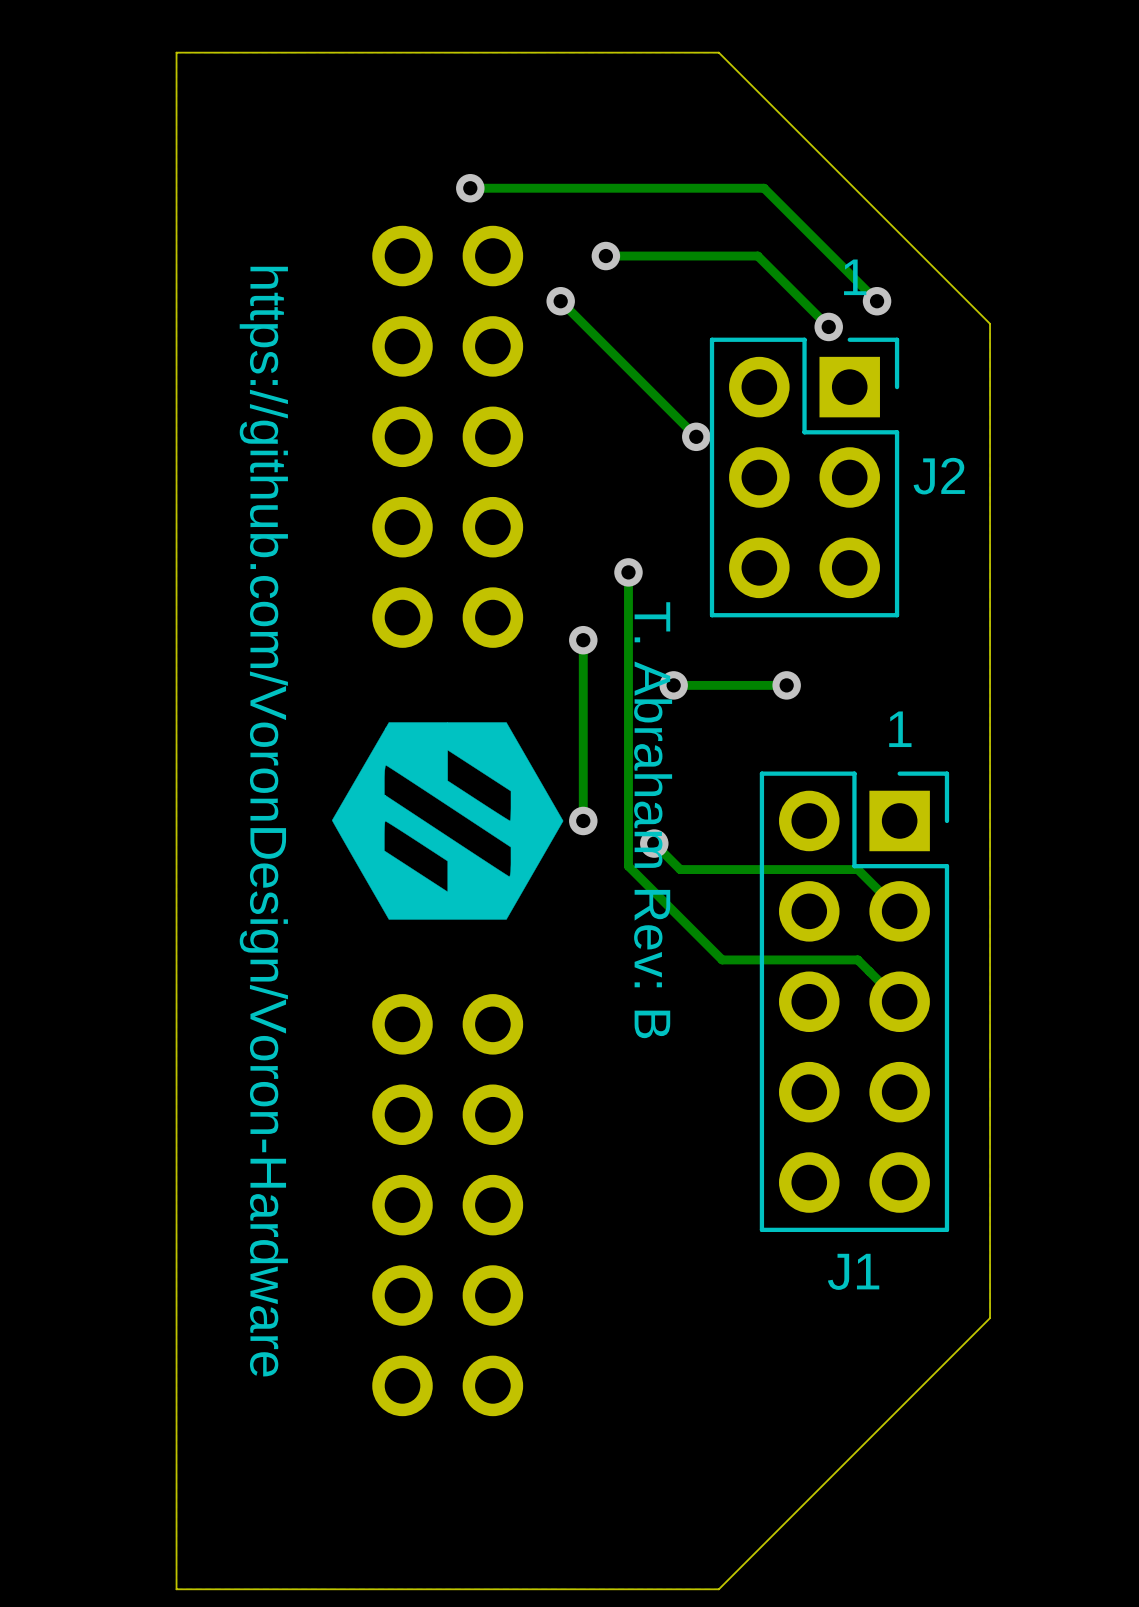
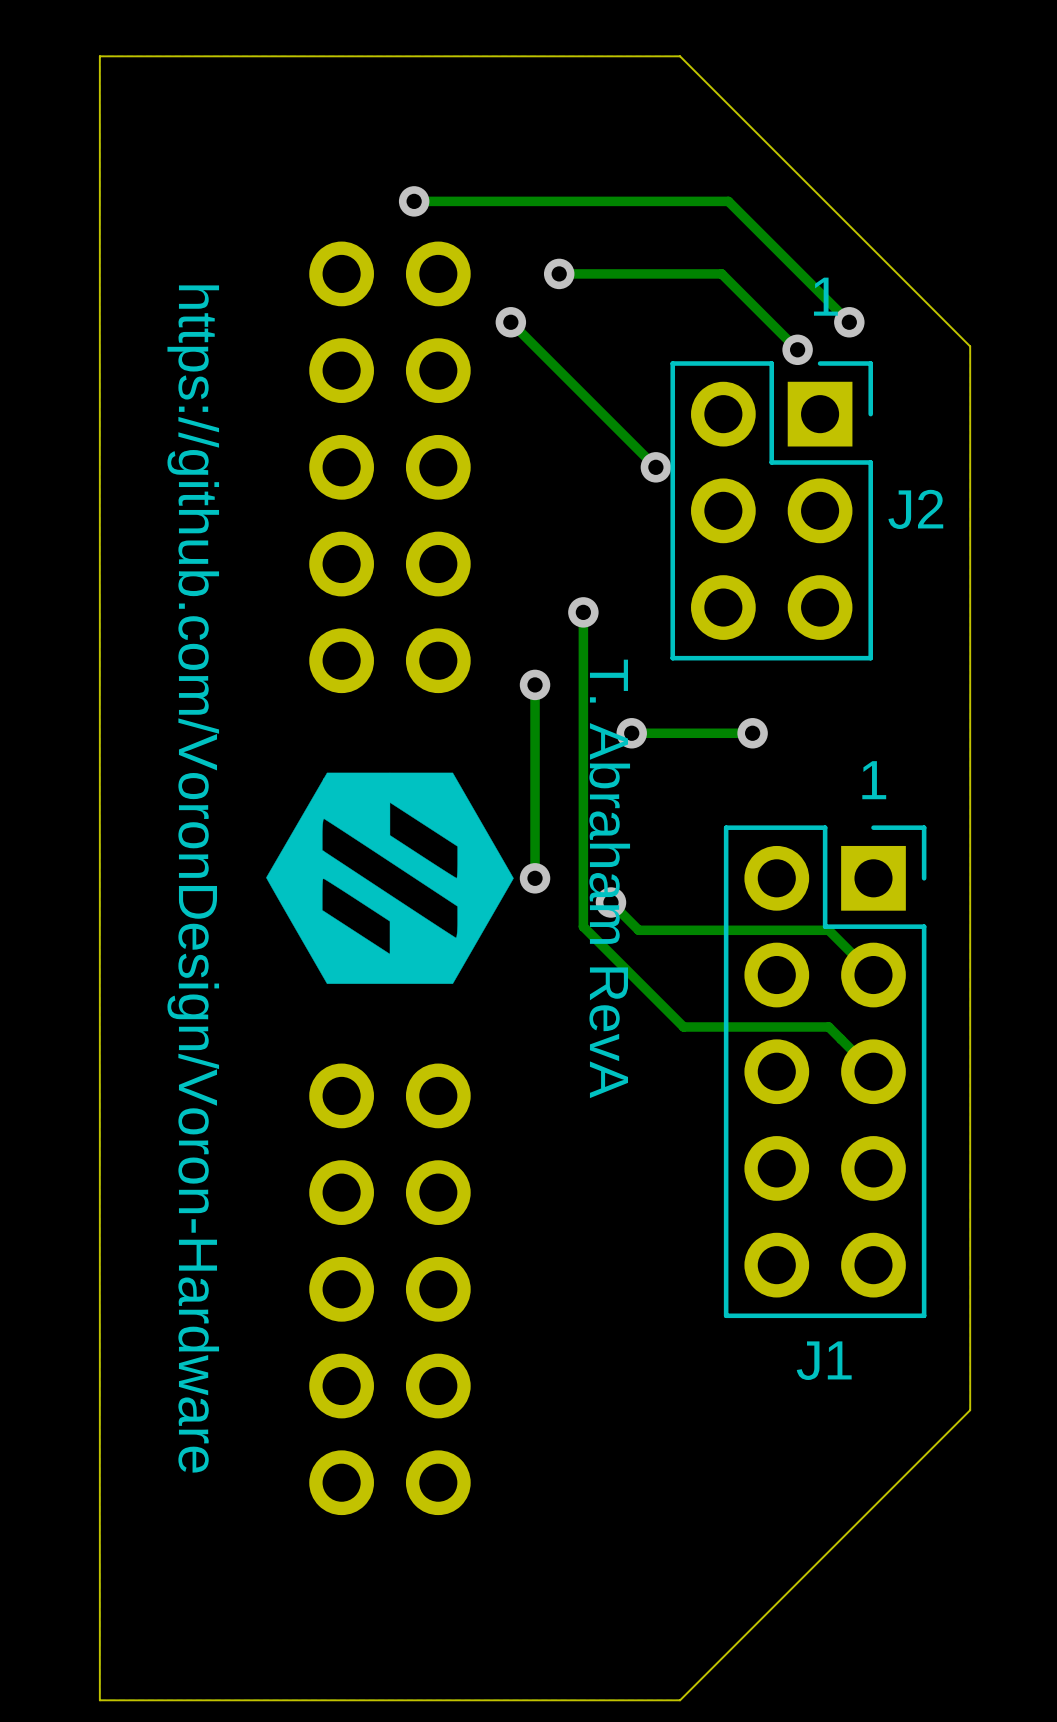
text: T. Abraham Rev: B (653, 820) -> T. Abraham RevA (609, 878)

